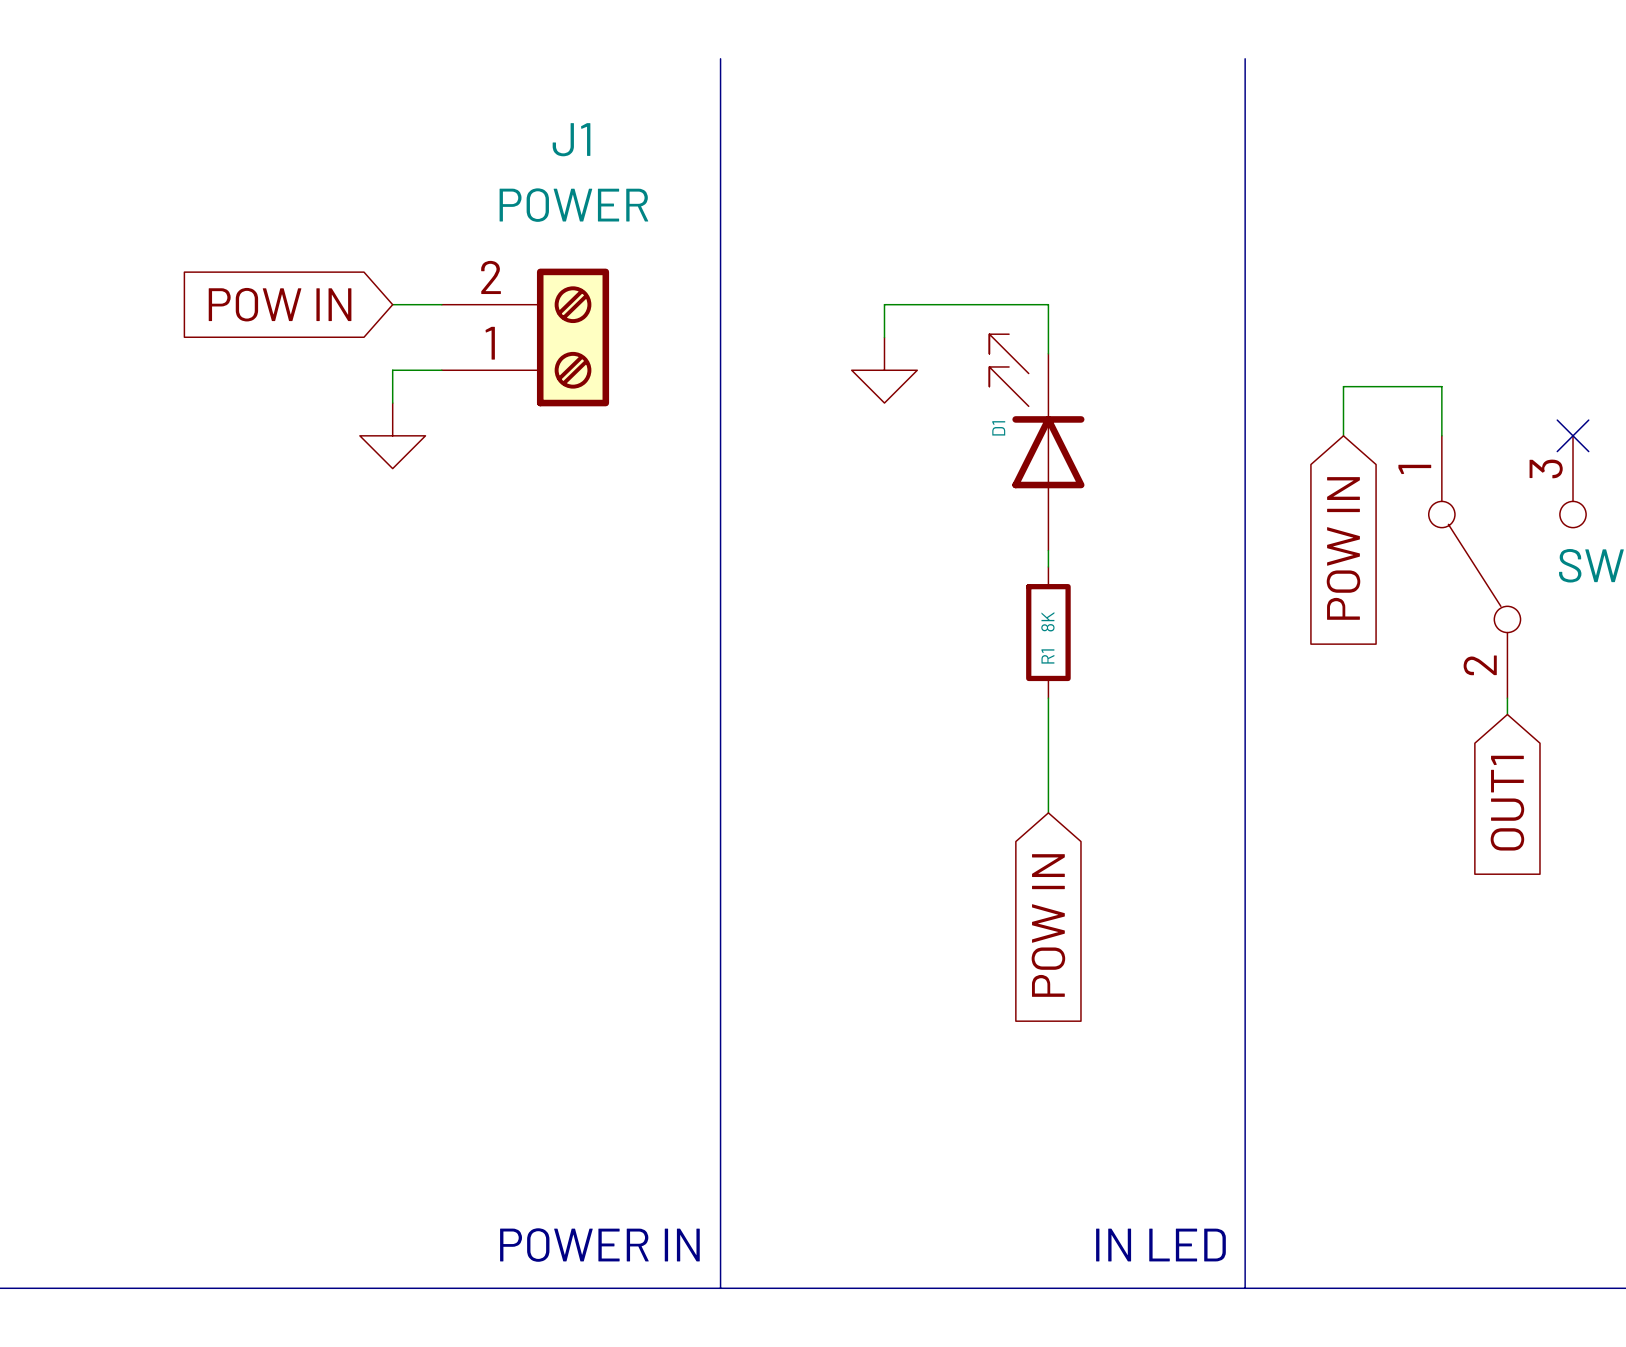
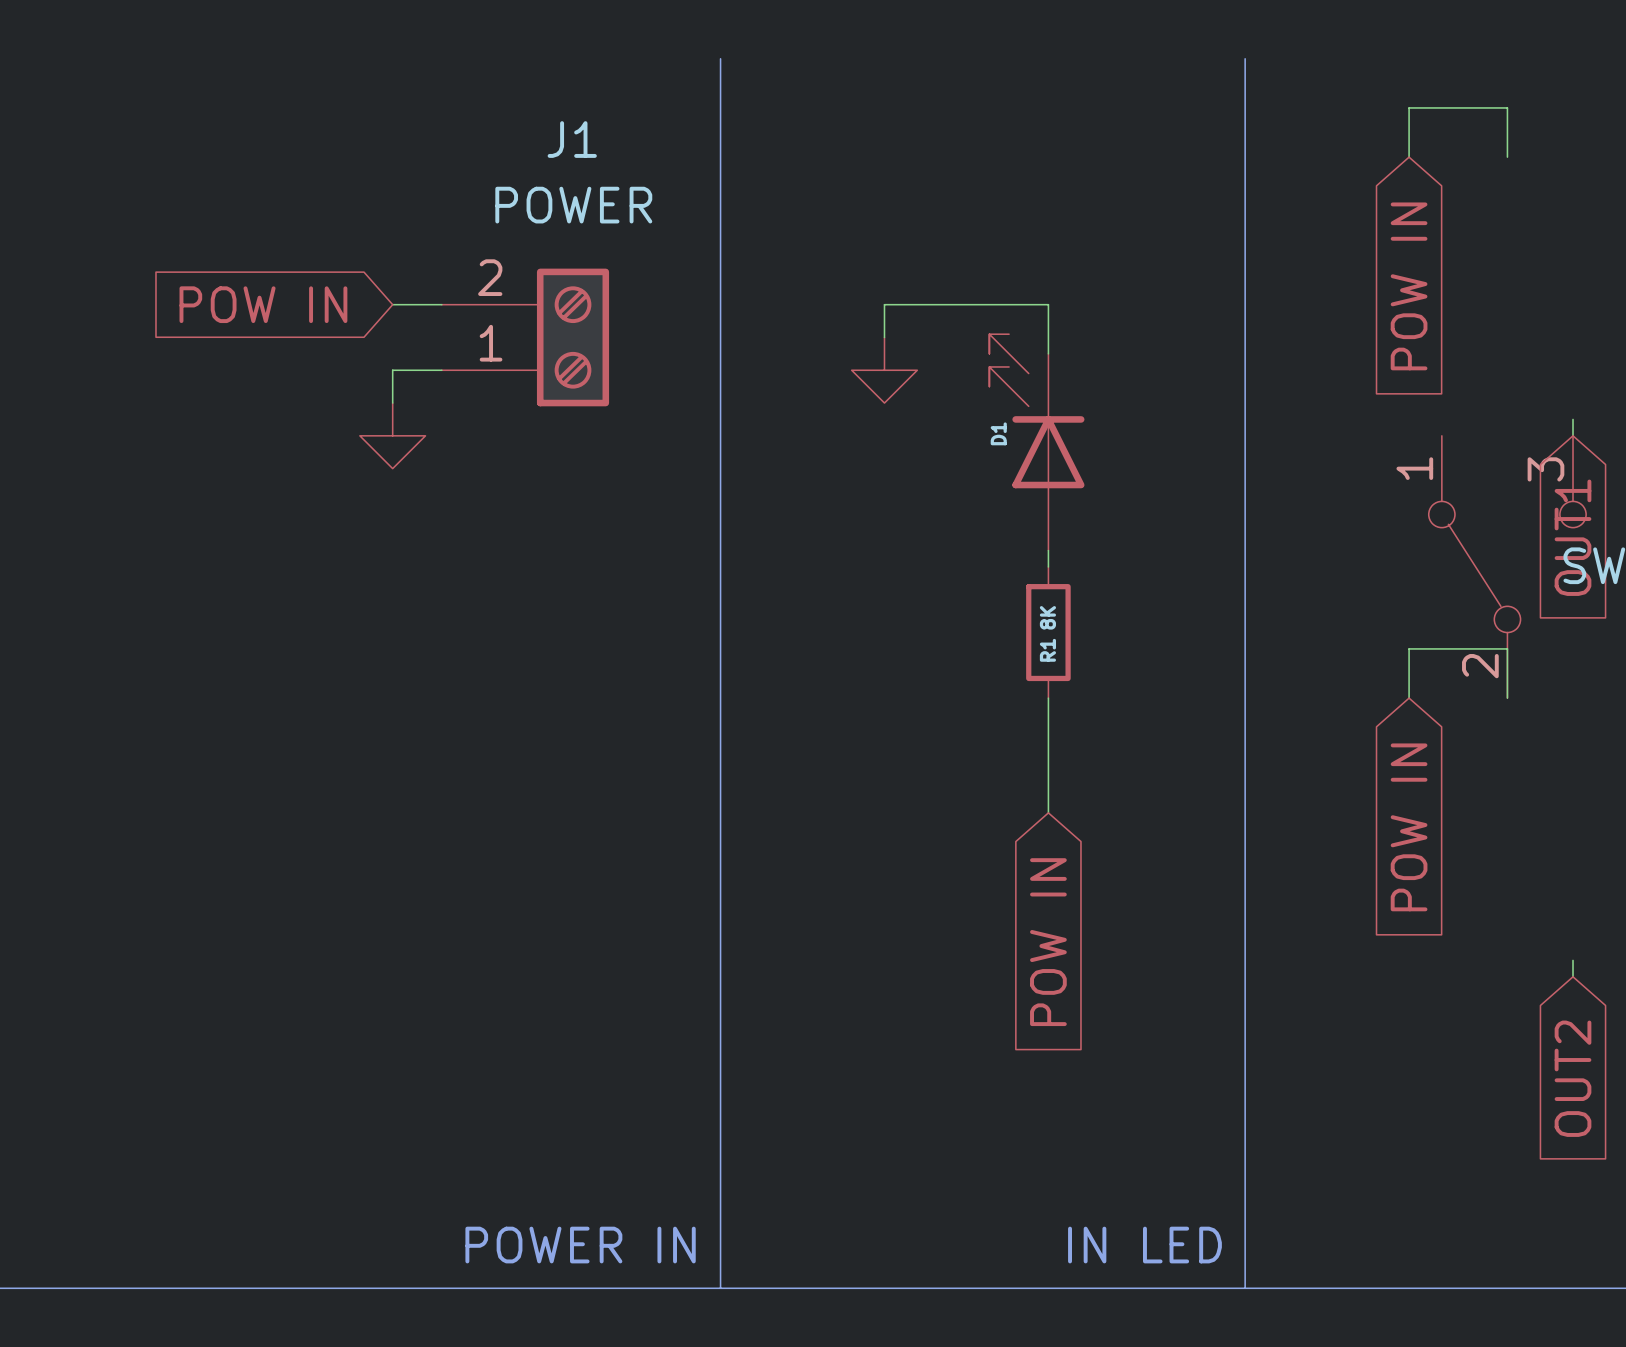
global label: none -> POW IN (1409, 286)
wire: none -> (1573, 419) (1573, 435)
wire: (1343, 435) (1343, 386) (1441, 386) (1441, 435) -> (1409, 157) (1409, 107) (1507, 107) (1507, 157)
no-connect mark: (1573, 435) -> none
global label: POW IN (1343, 548) -> none
wire: (1507, 698) (1507, 714) -> (1507, 698) (1507, 648) (1409, 648) (1409, 698)
global label position: OUT1 (1507, 803) -> OUT1 (1573, 537)
global label: none -> POW IN (1409, 827)
wire: none -> (1573, 960) (1573, 976)
global label: none -> OUT2 (1573, 1078)

